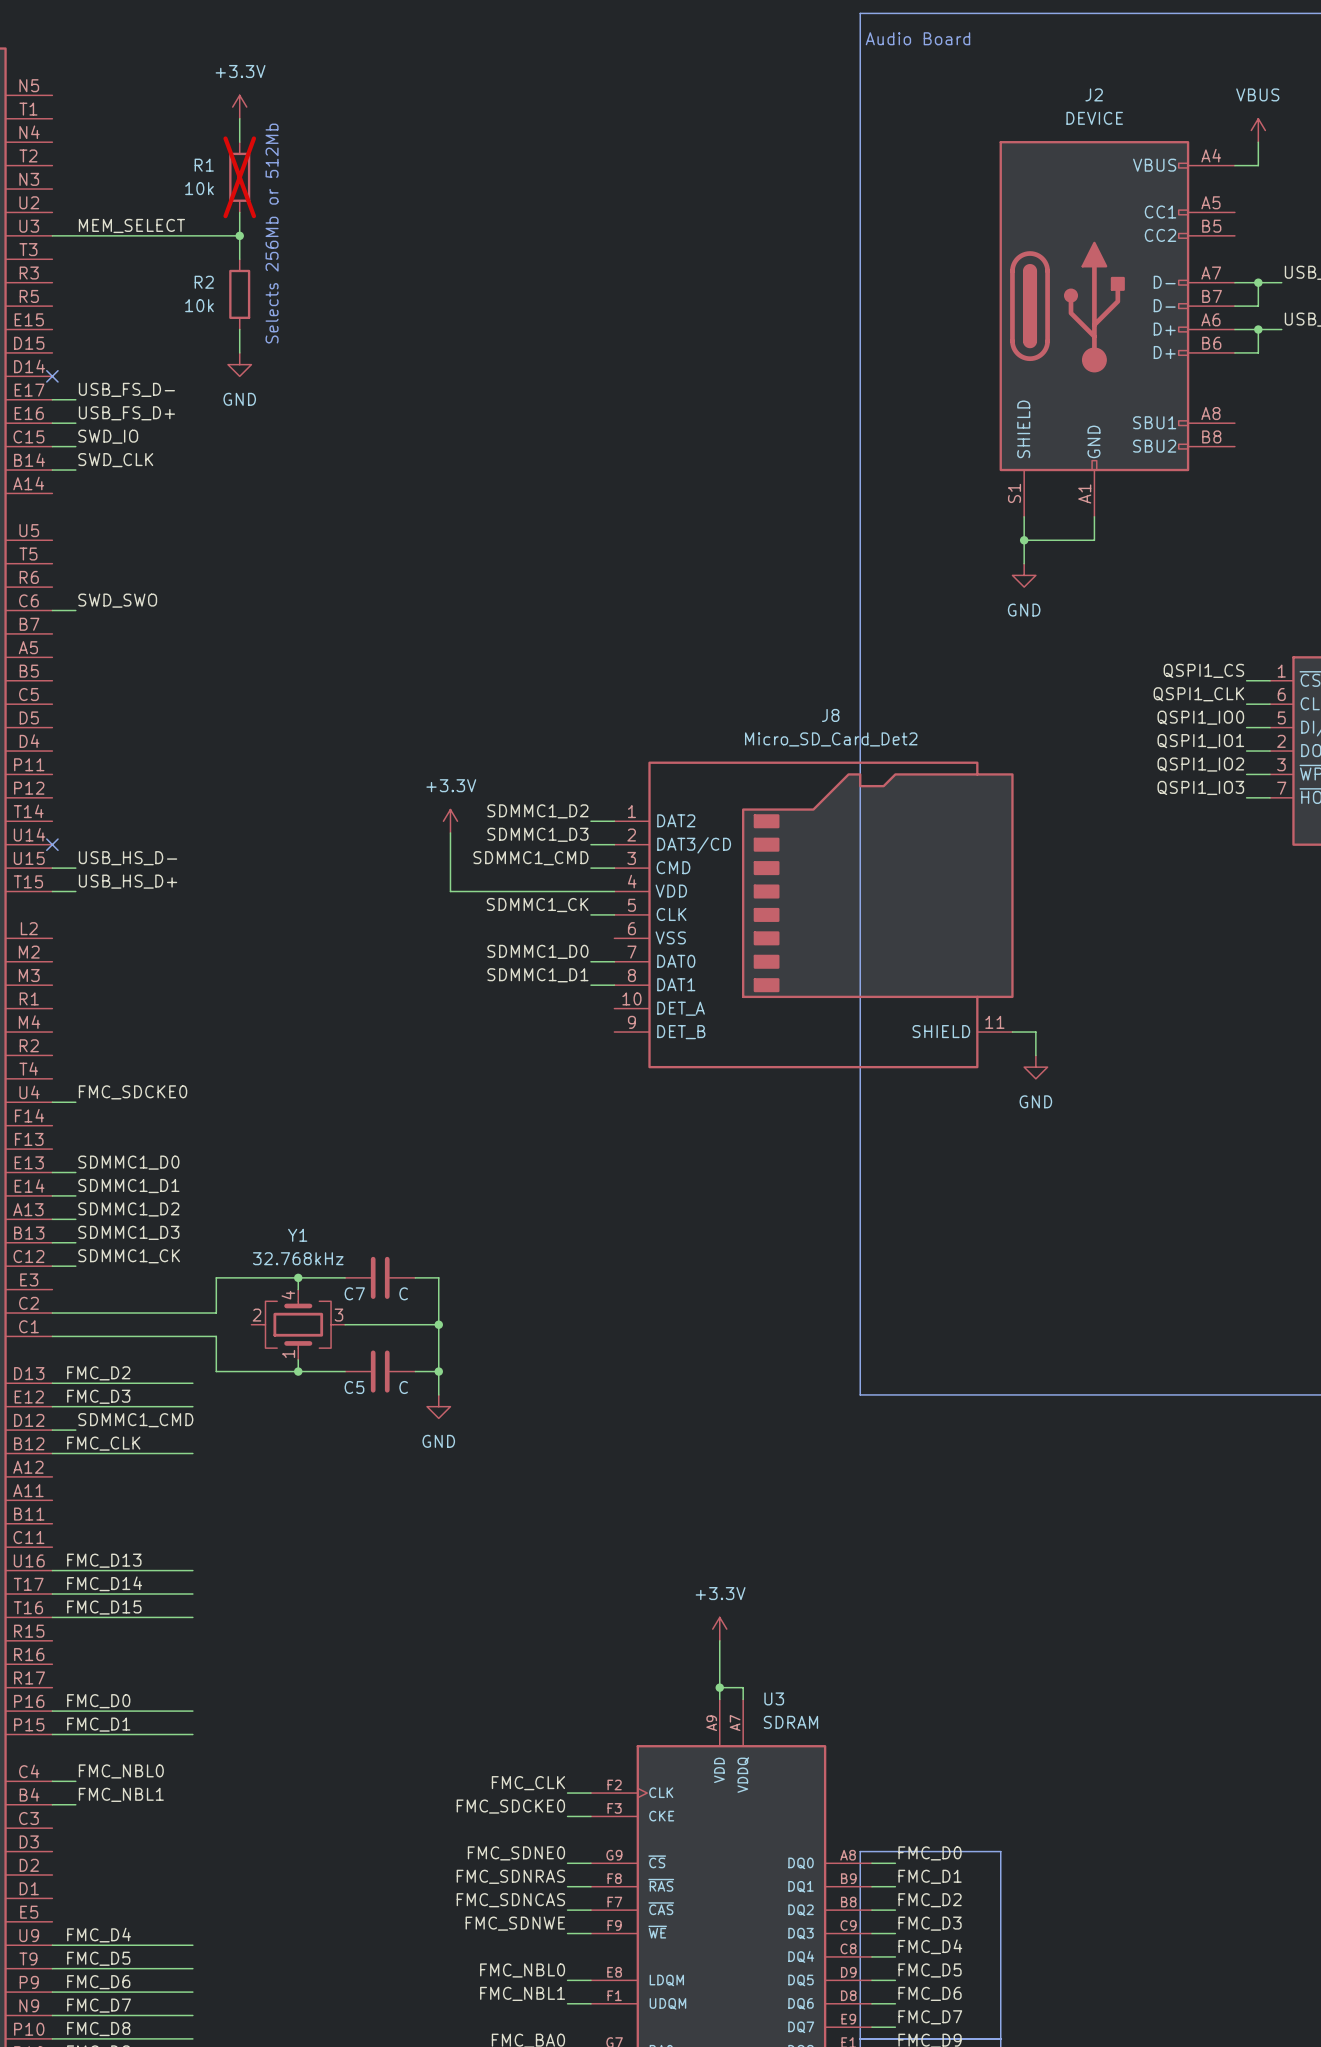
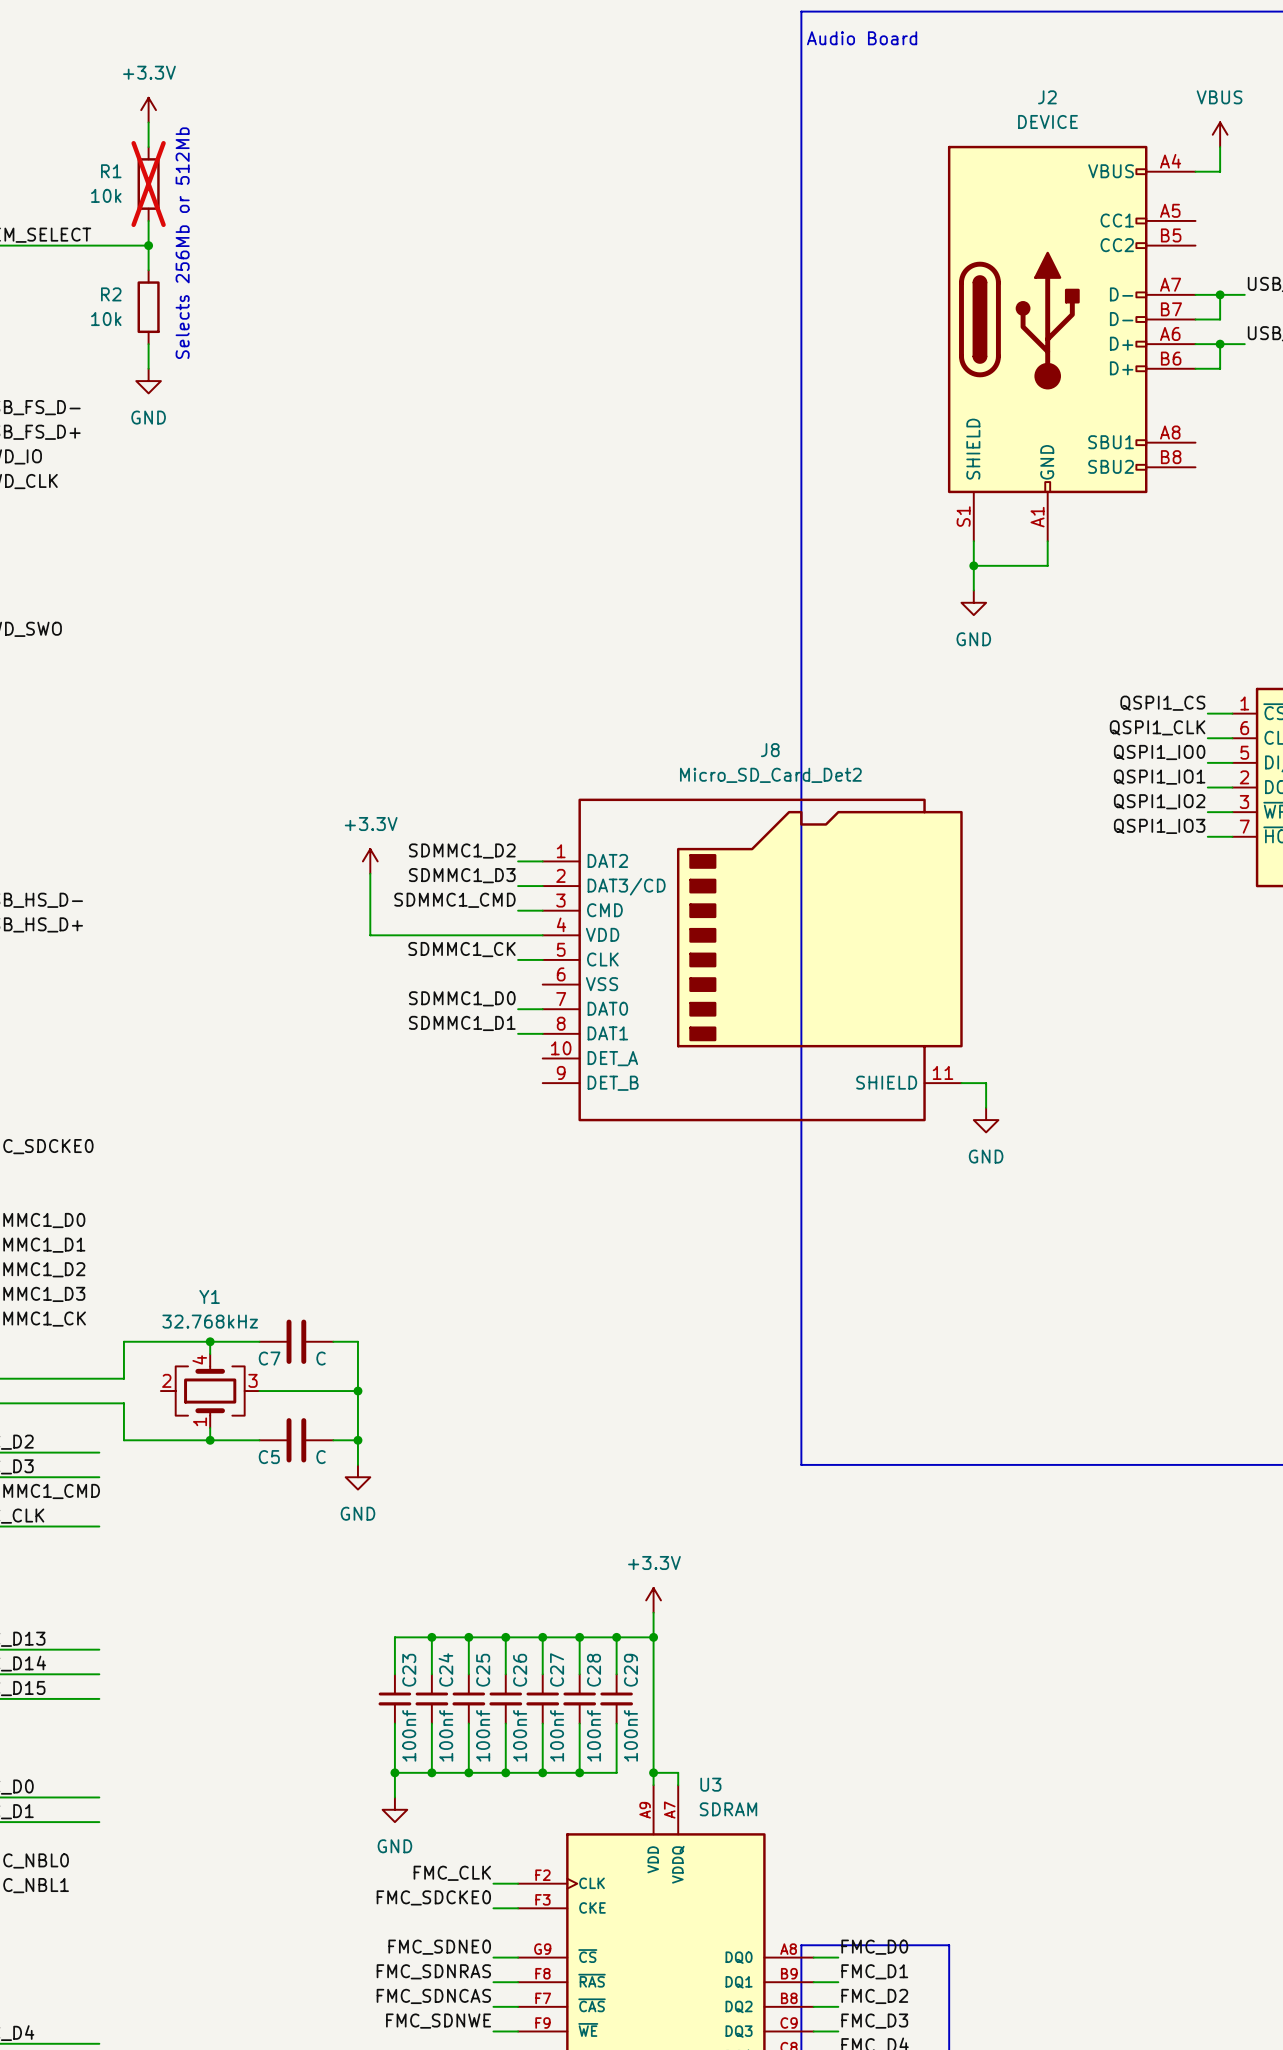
wire: none -> (653, 1612) (653, 1723)
wire: none -> (431, 1637) (431, 1674)
junction: none -> (431, 1637)
wire: none -> (468, 1637) (468, 1674)
junction: none -> (468, 1637)
wire: none -> (505, 1637) (505, 1674)
junction: none -> (505, 1637)
wire: none -> (542, 1637) (542, 1674)
junction: none -> (542, 1637)
wire: none -> (579, 1637) (579, 1674)
junction: none -> (579, 1637)
wire: none -> (616, 1637) (616, 1674)
junction: none -> (616, 1637)
wire: none -> (653, 1637) (394, 1637) (394, 1674)
junction: none -> (653, 1637)
C23: none -> 100nf (394, 1698)
C24: none -> 100nf (431, 1698)
C25: none -> 100nf (468, 1698)
C26: none -> 100nf (505, 1698)
C27: none -> 100nf (542, 1698)
C28: none -> 100nf (579, 1698)
C29: none -> 100nf (616, 1698)
power symbol position: +3.3V (719, 1629) -> +3.3V (653, 1600)
wire: none -> (394, 1723) (394, 1797)
wire: none -> (431, 1723) (431, 1772)
wire: none -> (468, 1723) (468, 1772)
wire: none -> (505, 1723) (505, 1772)
wire: none -> (542, 1723) (542, 1772)
wire: none -> (579, 1723) (579, 1772)
wire: none -> (616, 1723) (616, 1772) (394, 1772)
junction: none -> (394, 1772)
junction: none -> (431, 1772)
junction: none -> (468, 1772)
junction: none -> (505, 1772)
junction: none -> (542, 1772)
junction: none -> (579, 1772)
power symbol: none -> GND (394, 1809)

